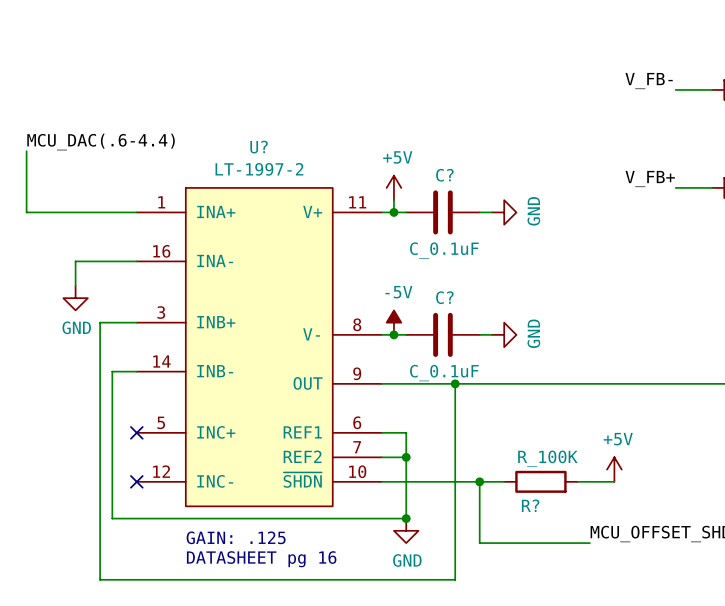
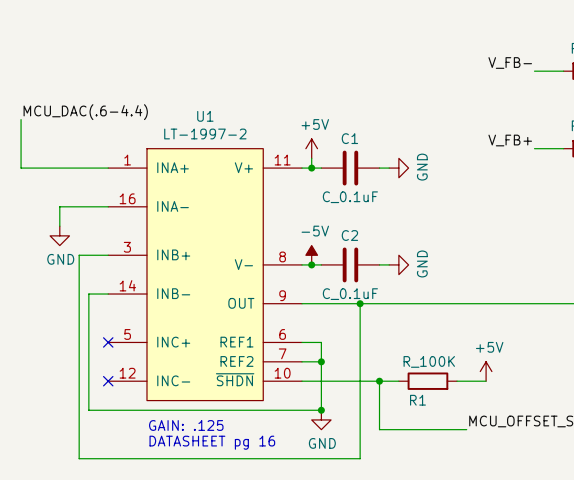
U? name: U? (259, 147) -> U1 (205, 116)
C? name: C? (444, 175) -> C1 (349, 138)
C? name: C? (444, 297) -> C2 (349, 235)
R? name: R? (530, 505) -> R1 (417, 400)

